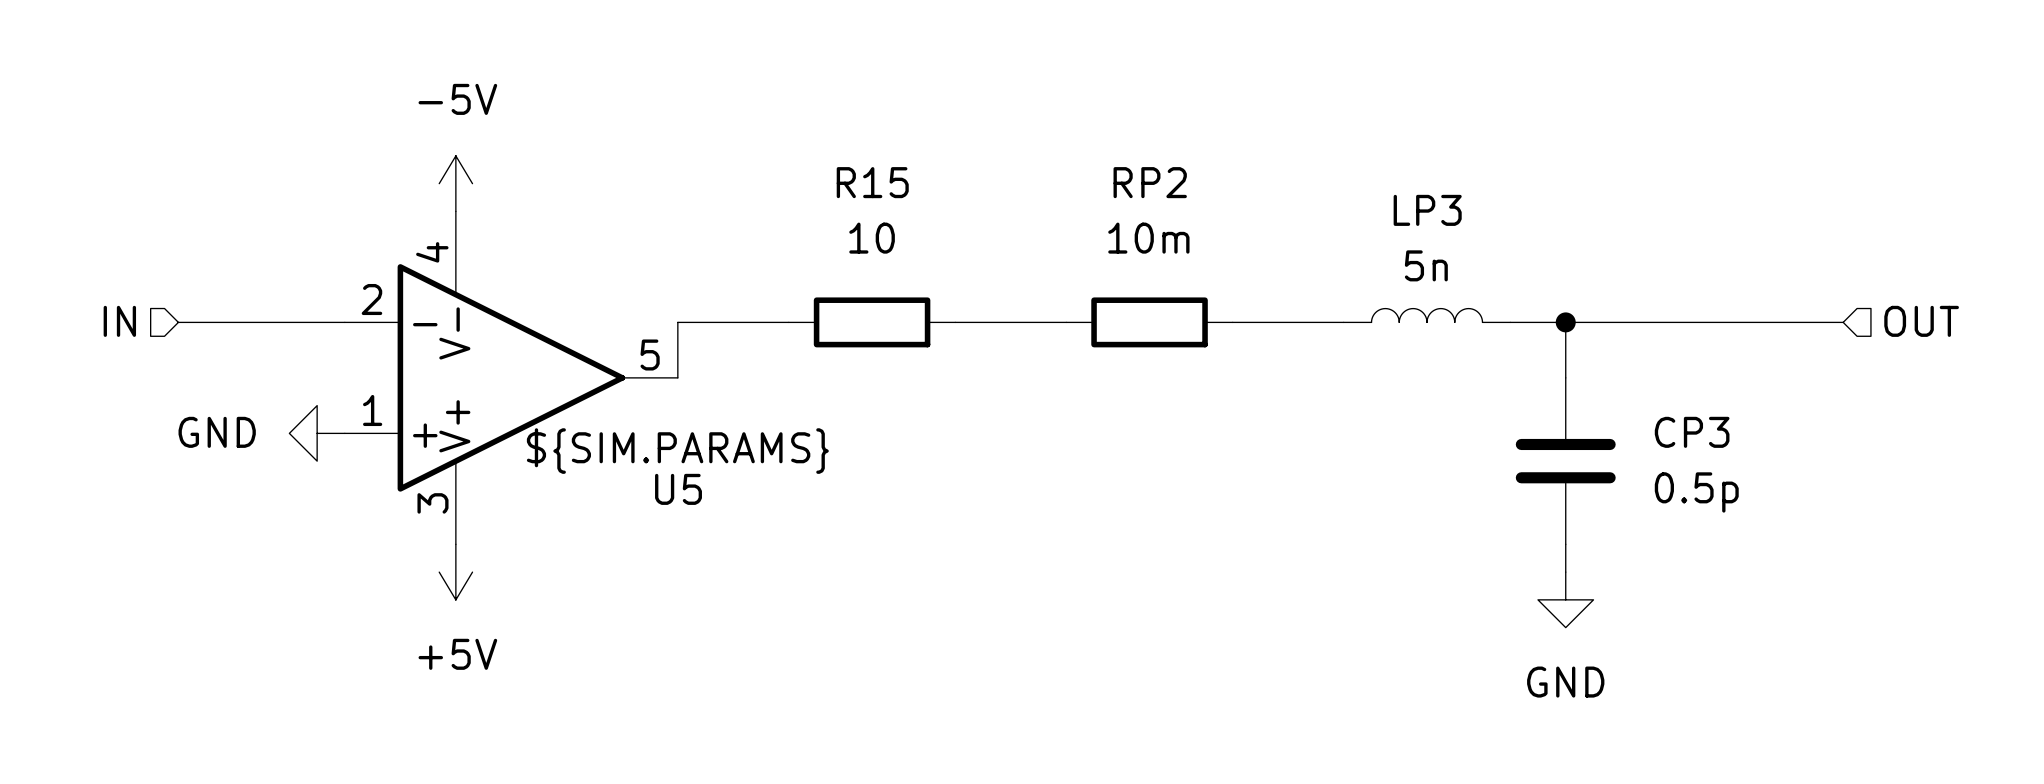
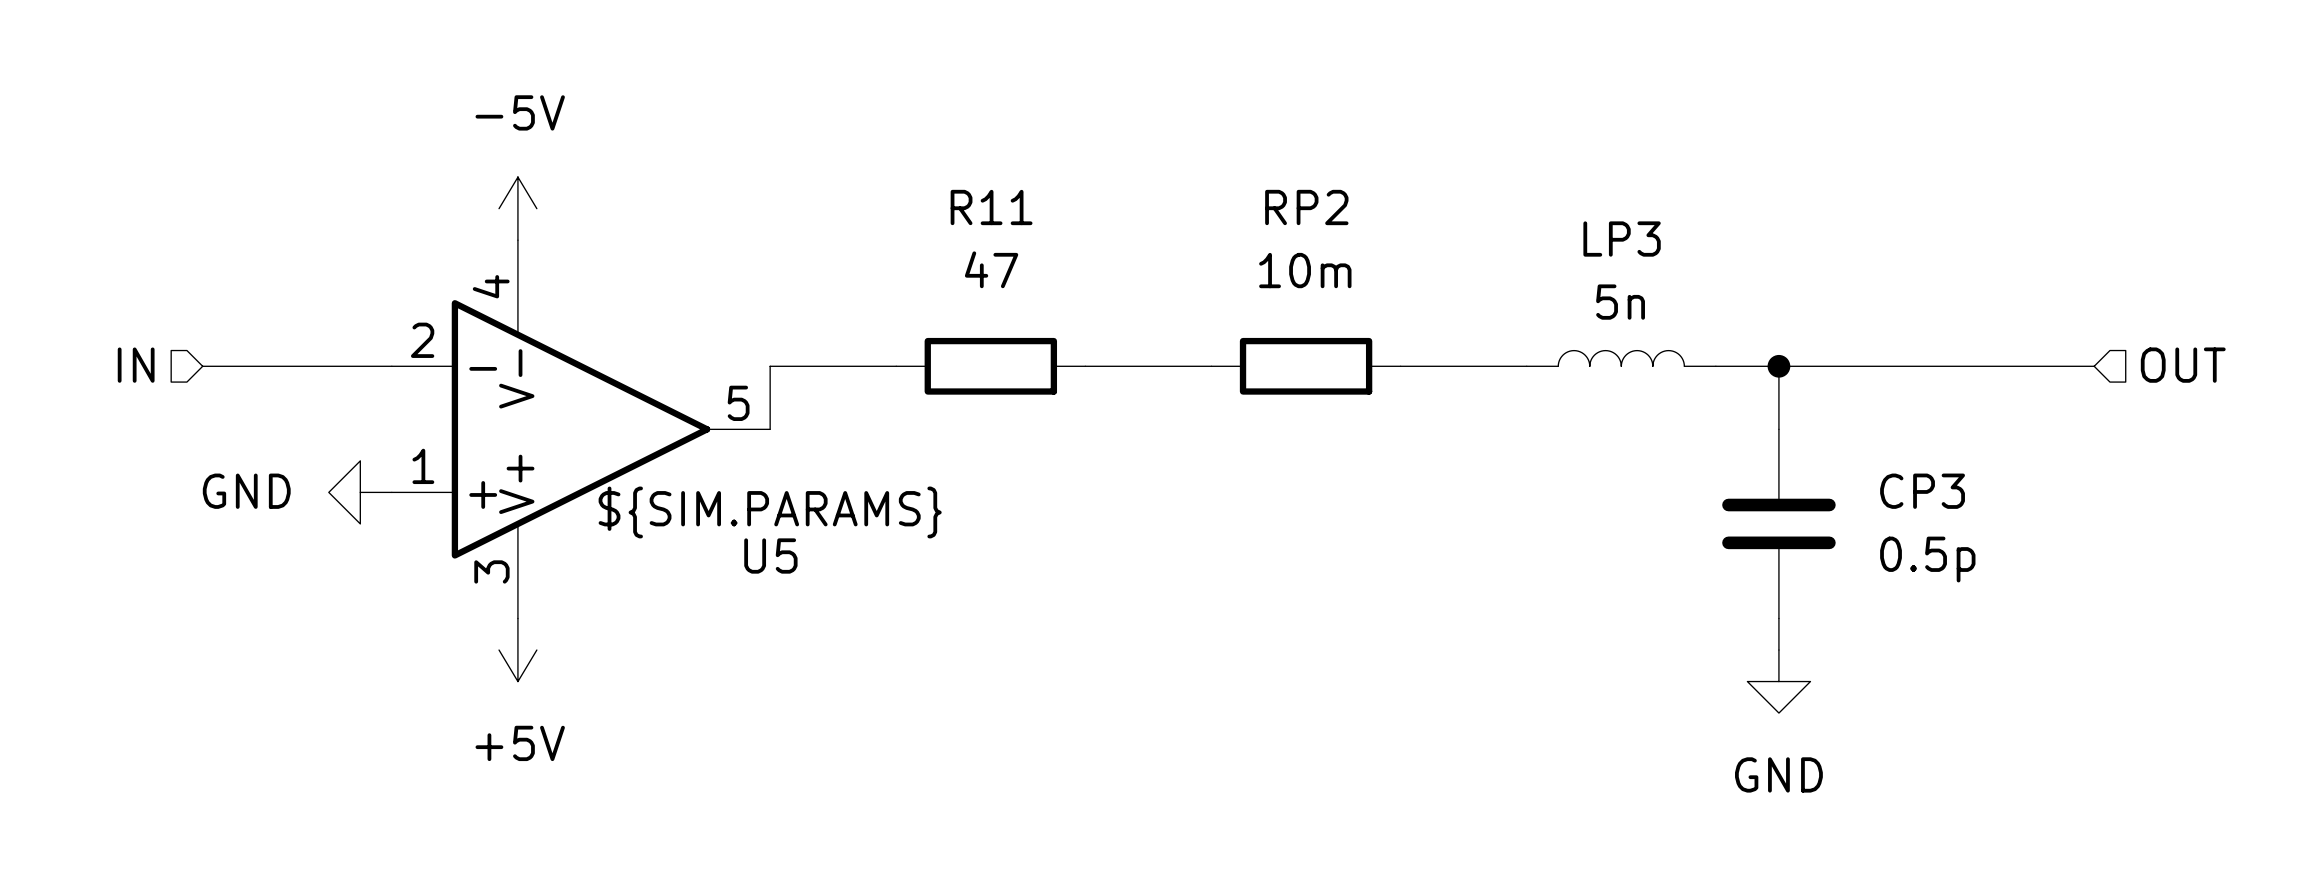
R15 name: R15 (872, 182) -> R11 (991, 207)
R15 value: 10 (872, 238) -> 47 (991, 269)

